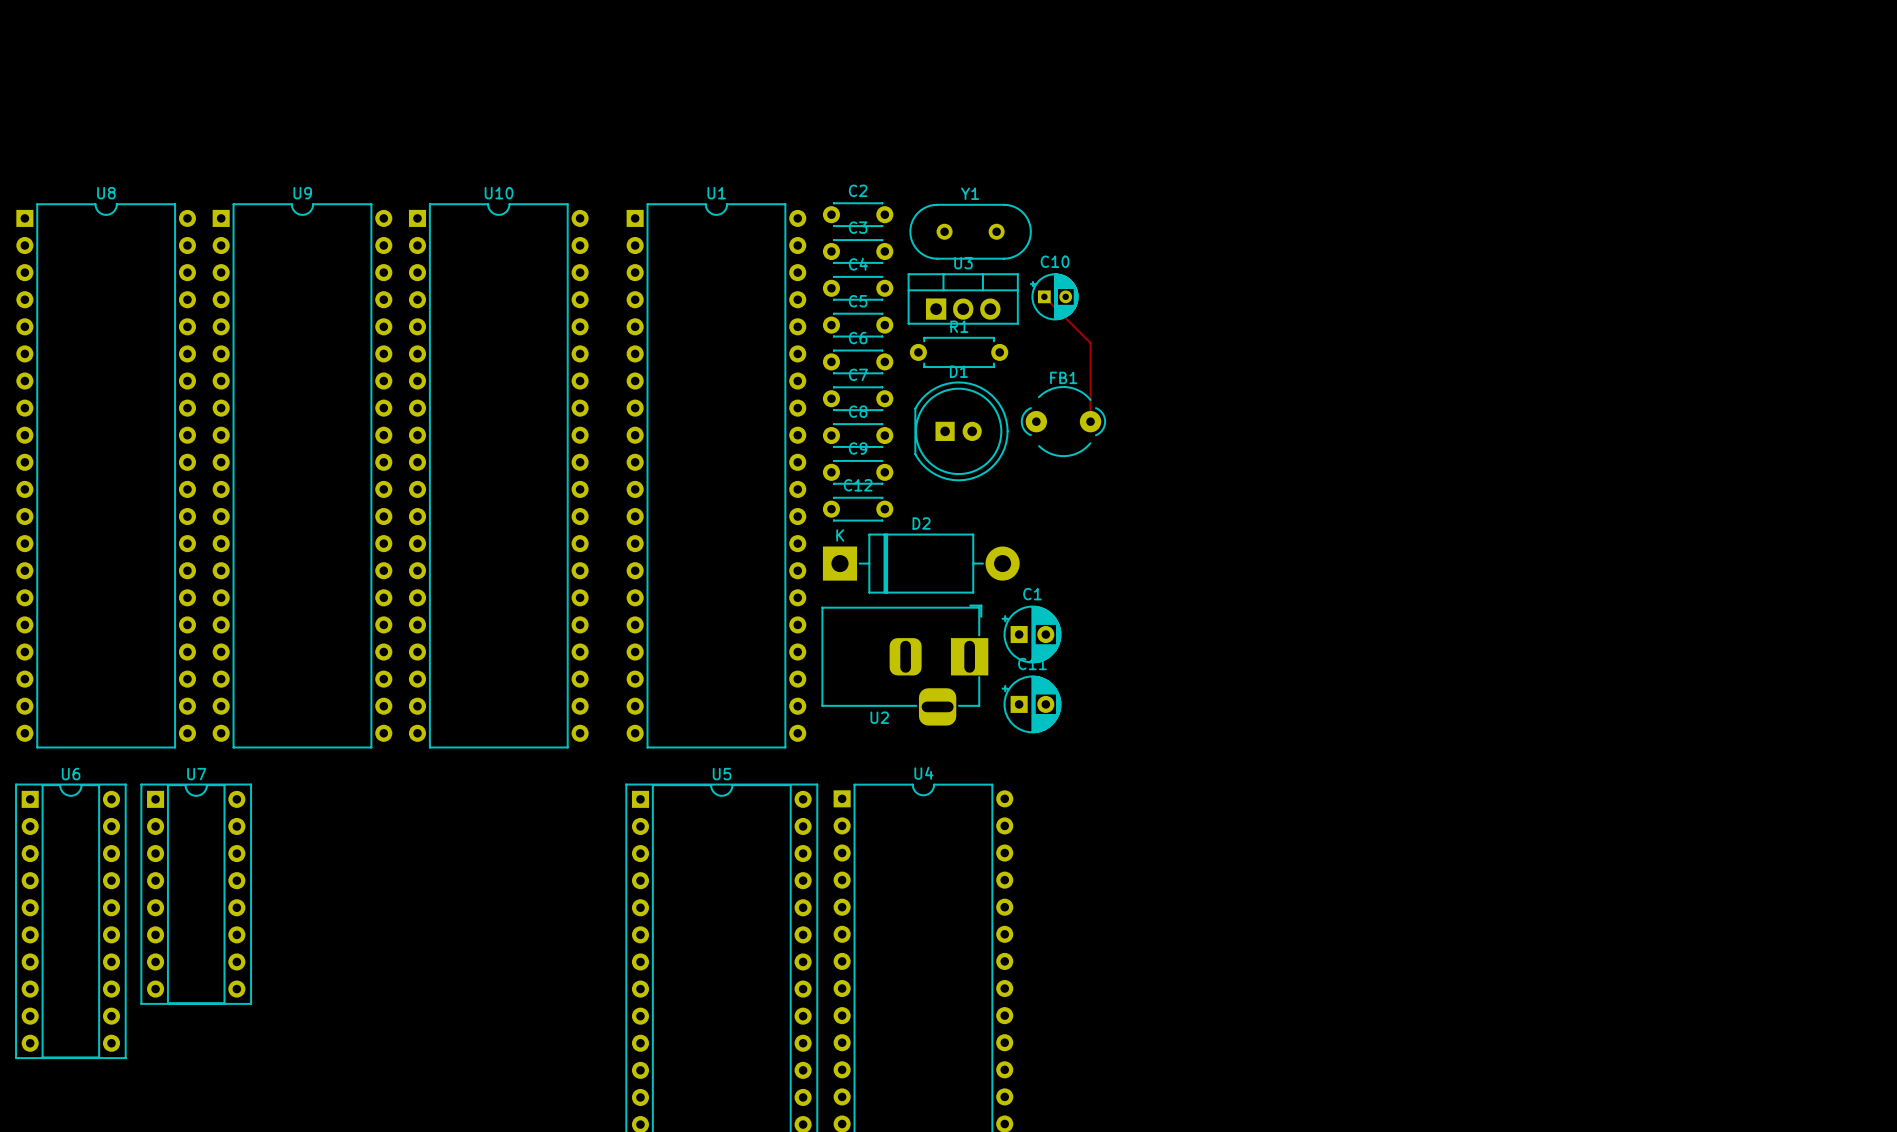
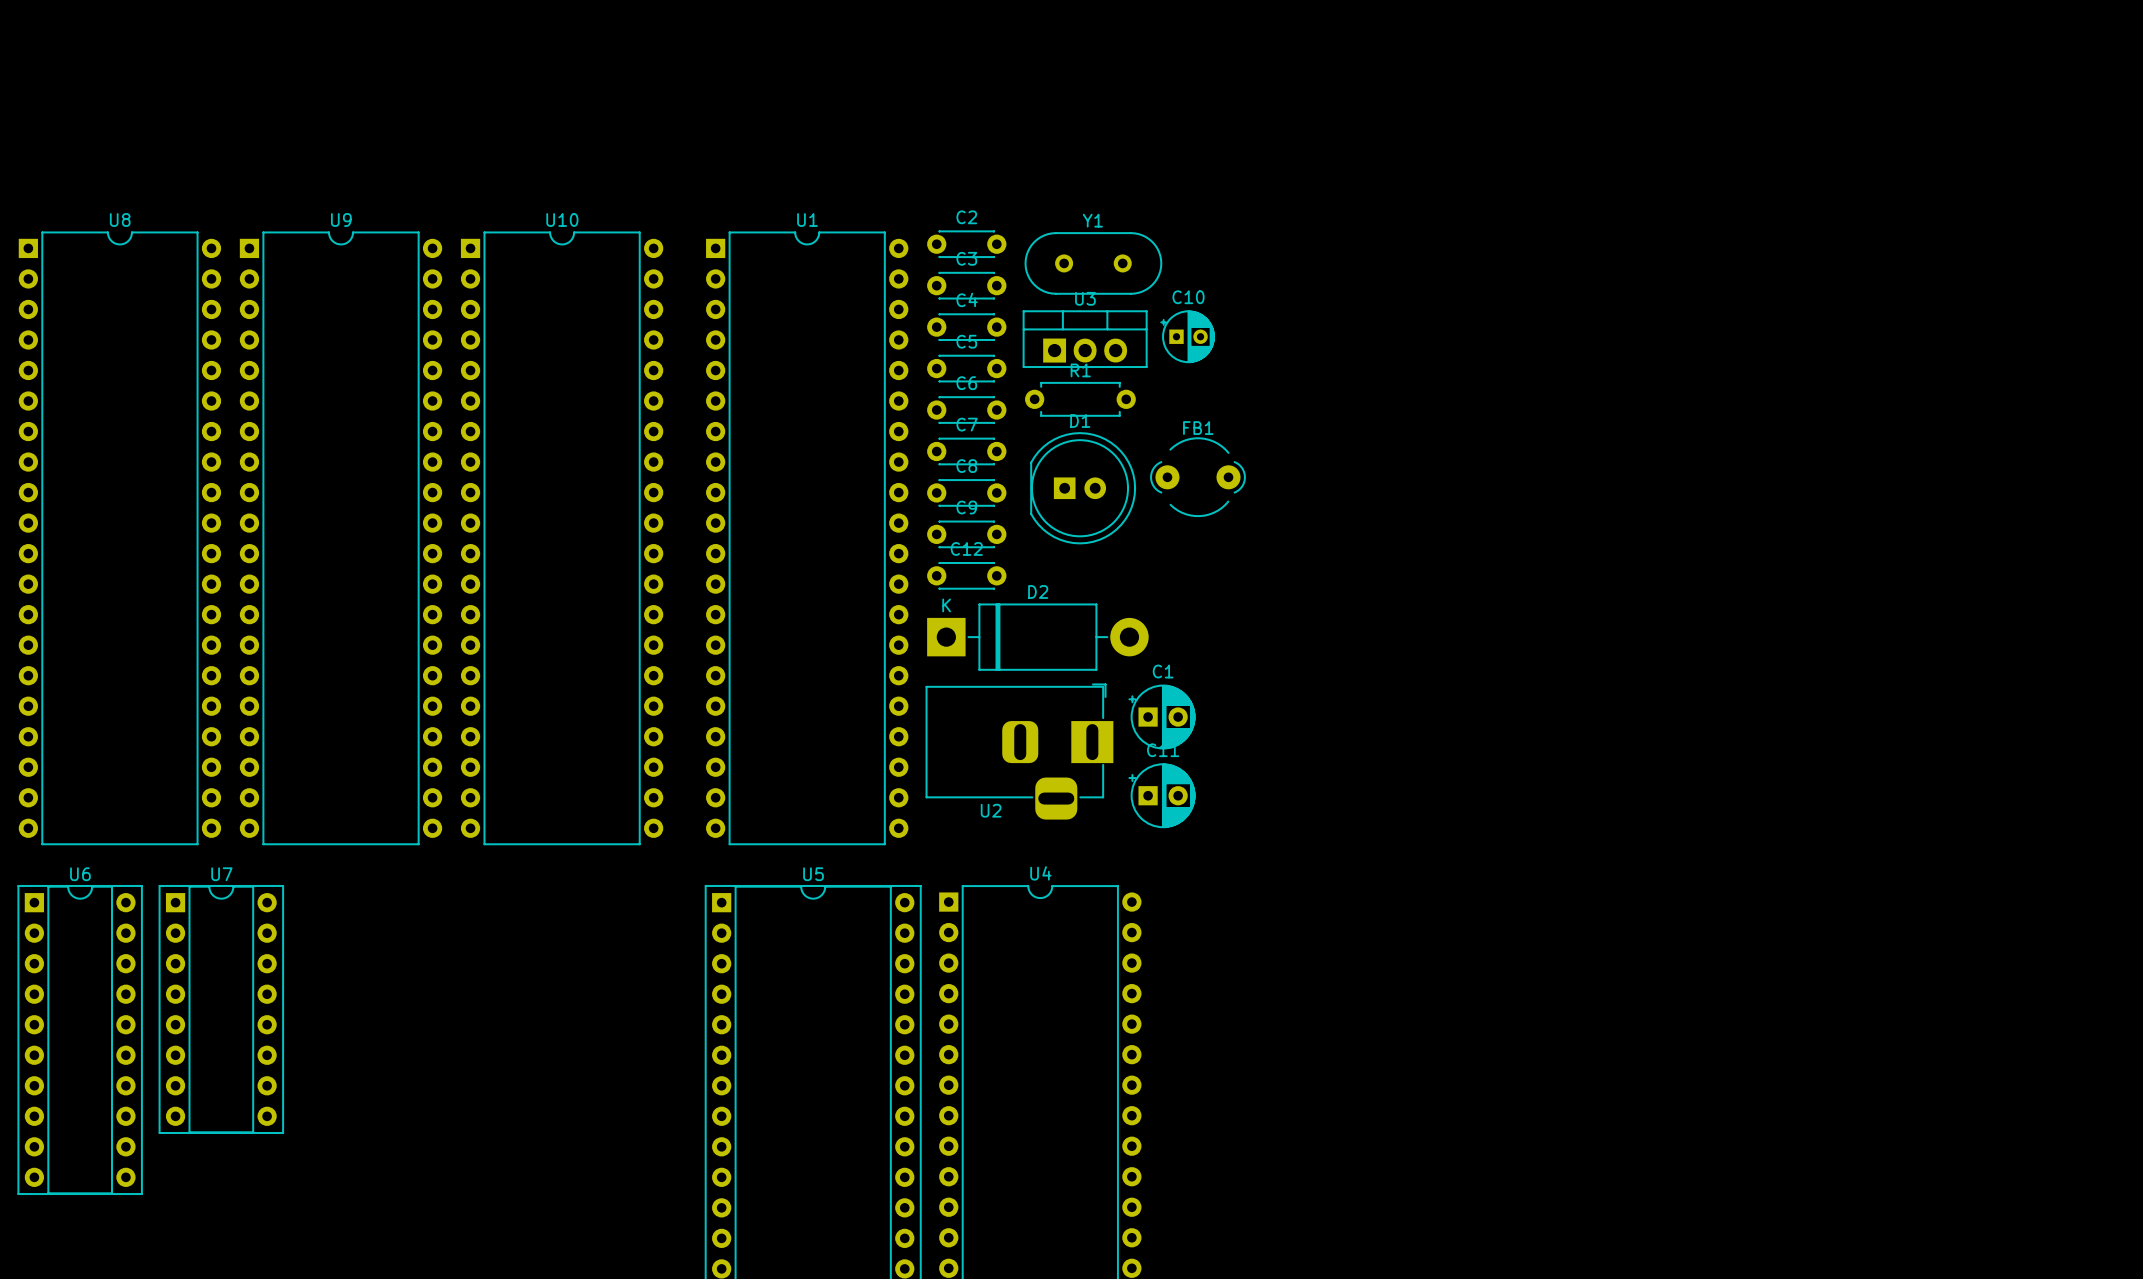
track: (1044, 296) (1090, 343) (1090, 421) -> none

